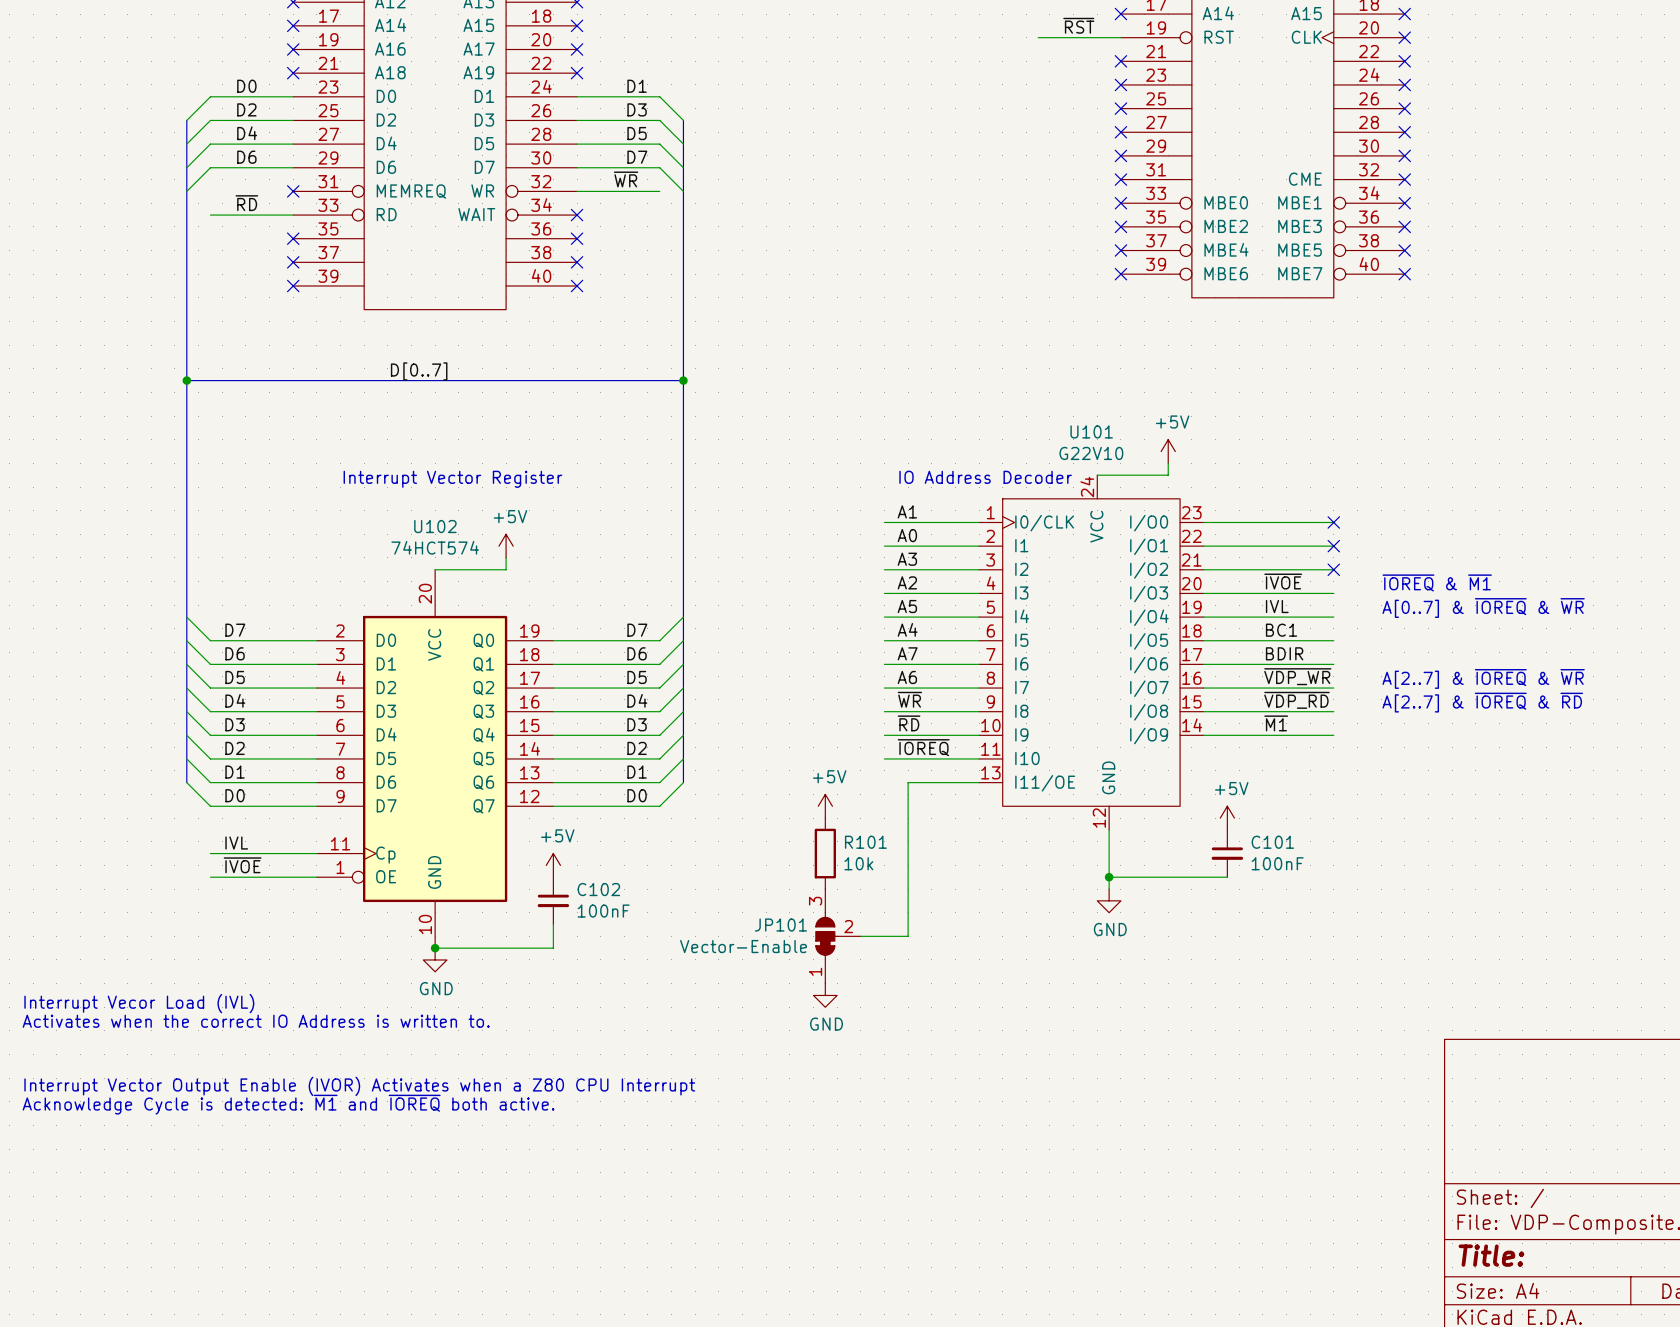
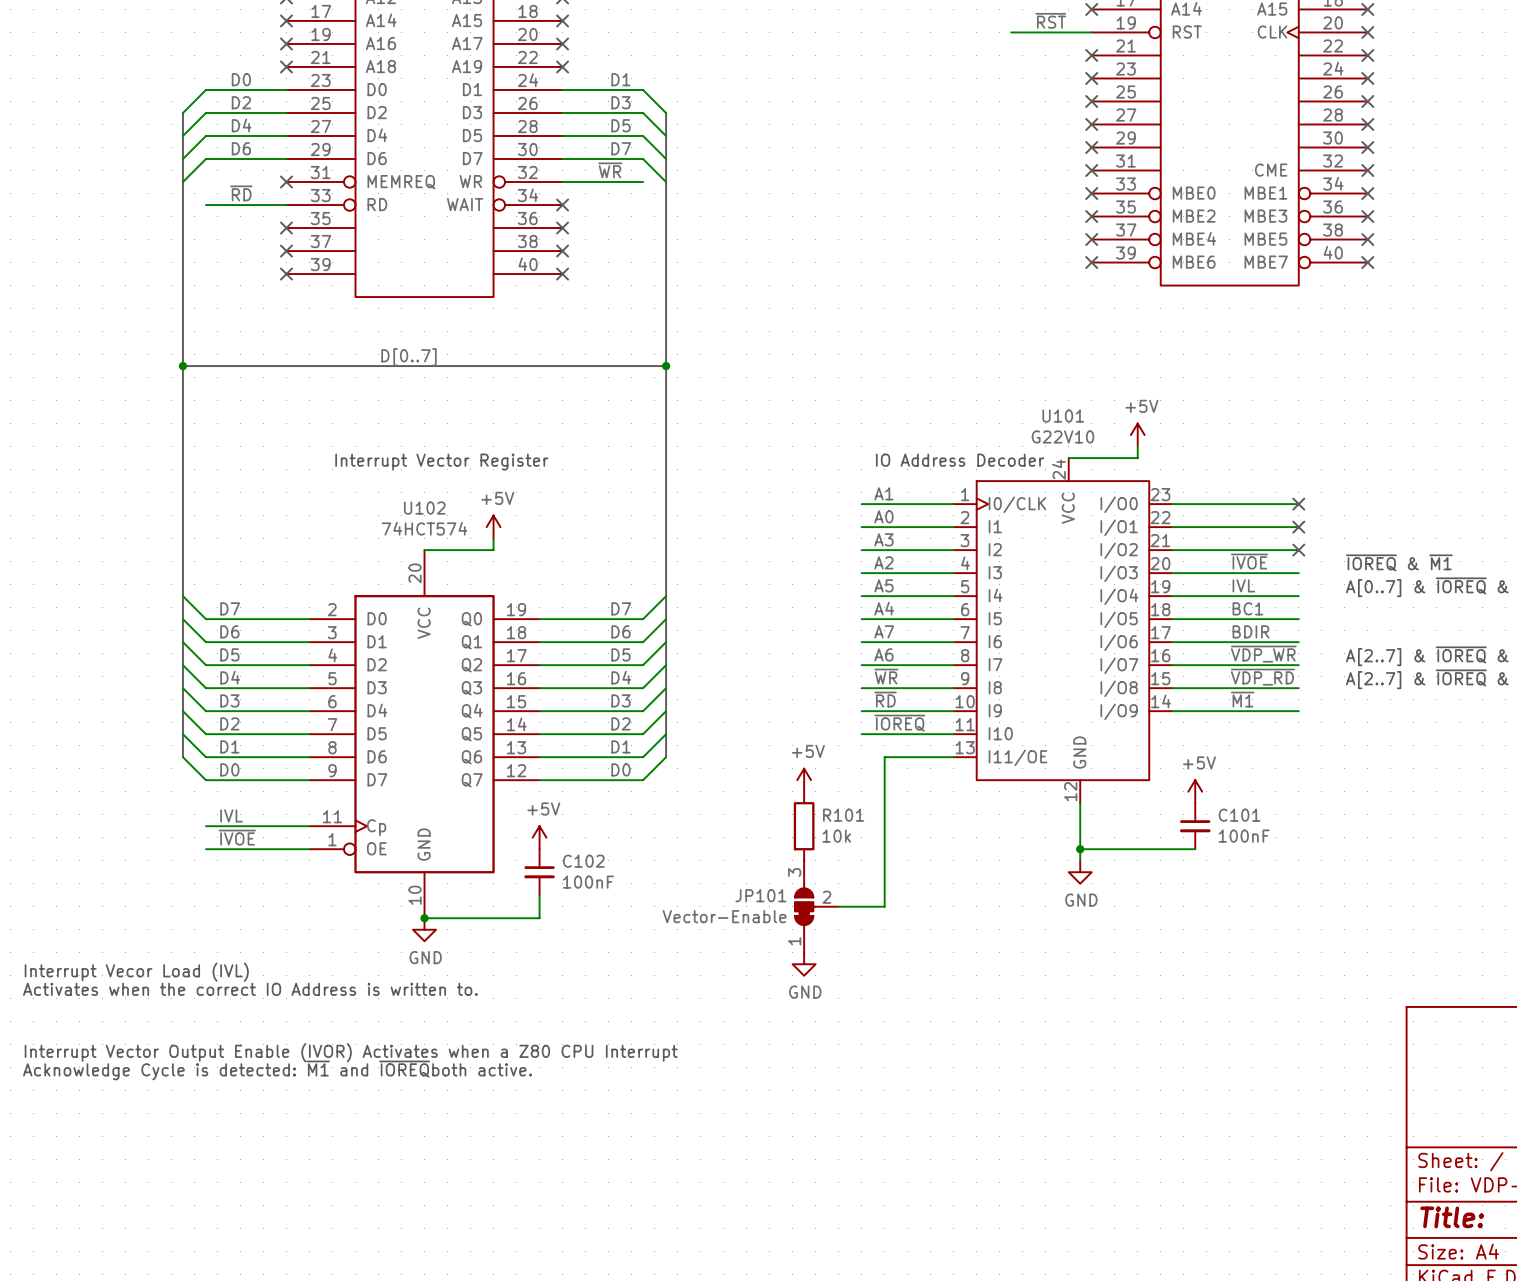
text: Acknowledge Cycle is detected: ~{M1} and ~{IOREQ} both active. (288, 1104) -> Acknowledge Cycle is detected: ~{M1} and ~{IOREQ}both active. (277, 1070)

